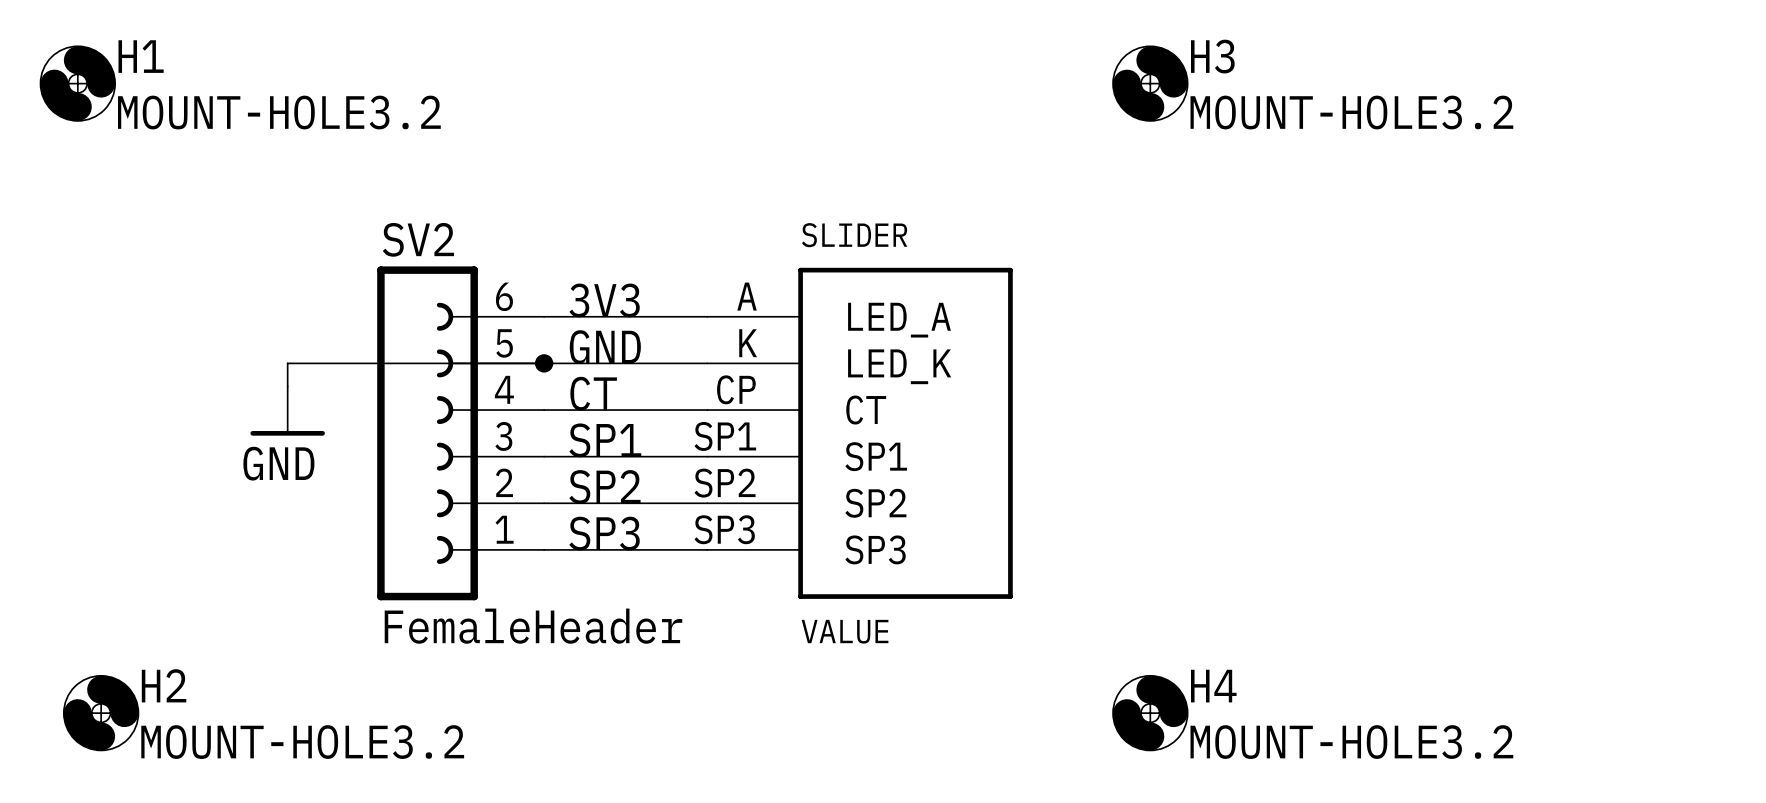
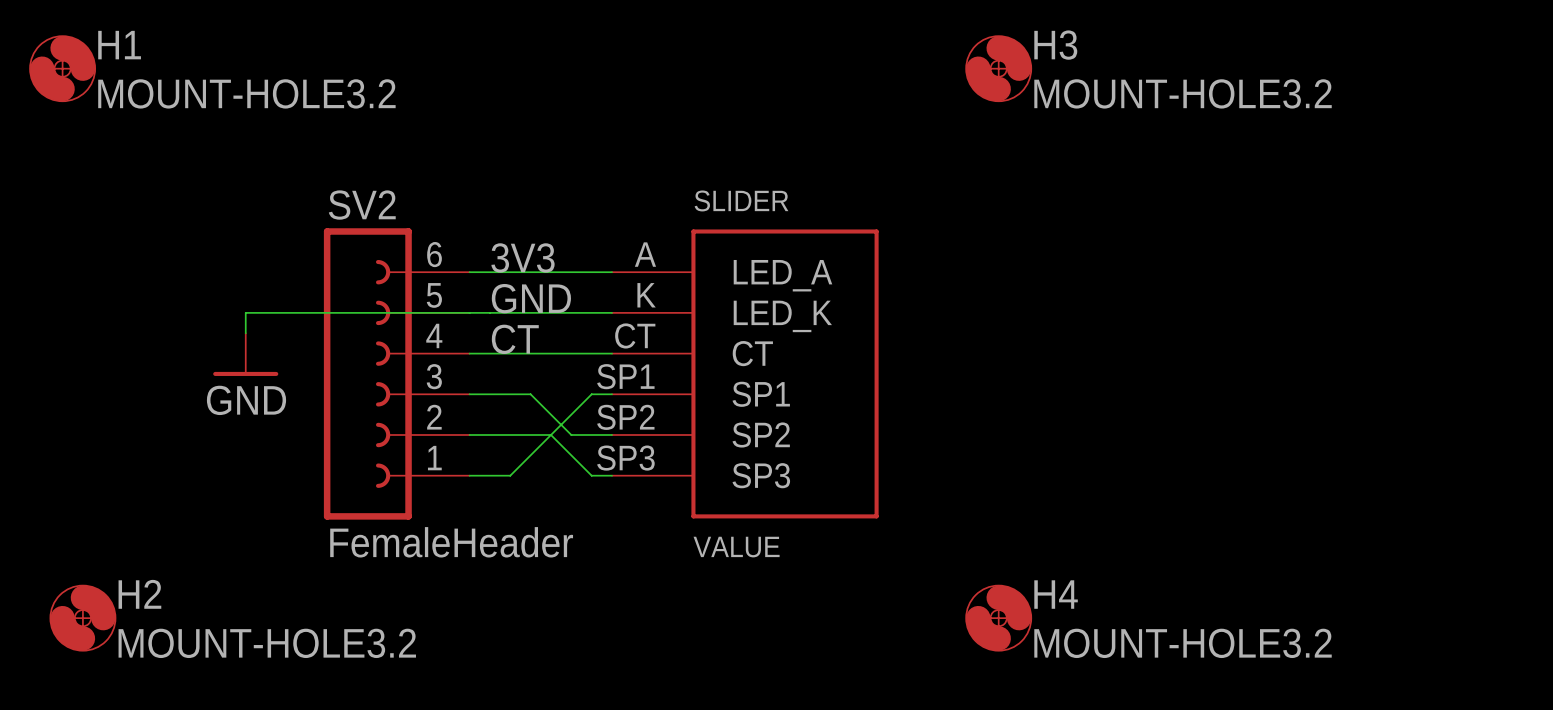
junction: (544, 363) -> none
part pin number: CP (736, 389) -> CT (635, 335)
label: SP1 (605, 440) -> none
wire: (614, 456) (684, 456) -> (510, 475) (591, 394)
label: SP2 (604, 486) -> none
wire: (637, 503) (660, 503) -> (530, 394) (571, 434)
label: SP3 (604, 533) -> none
wire: (590, 549) (684, 549) -> (550, 434) (591, 475)

